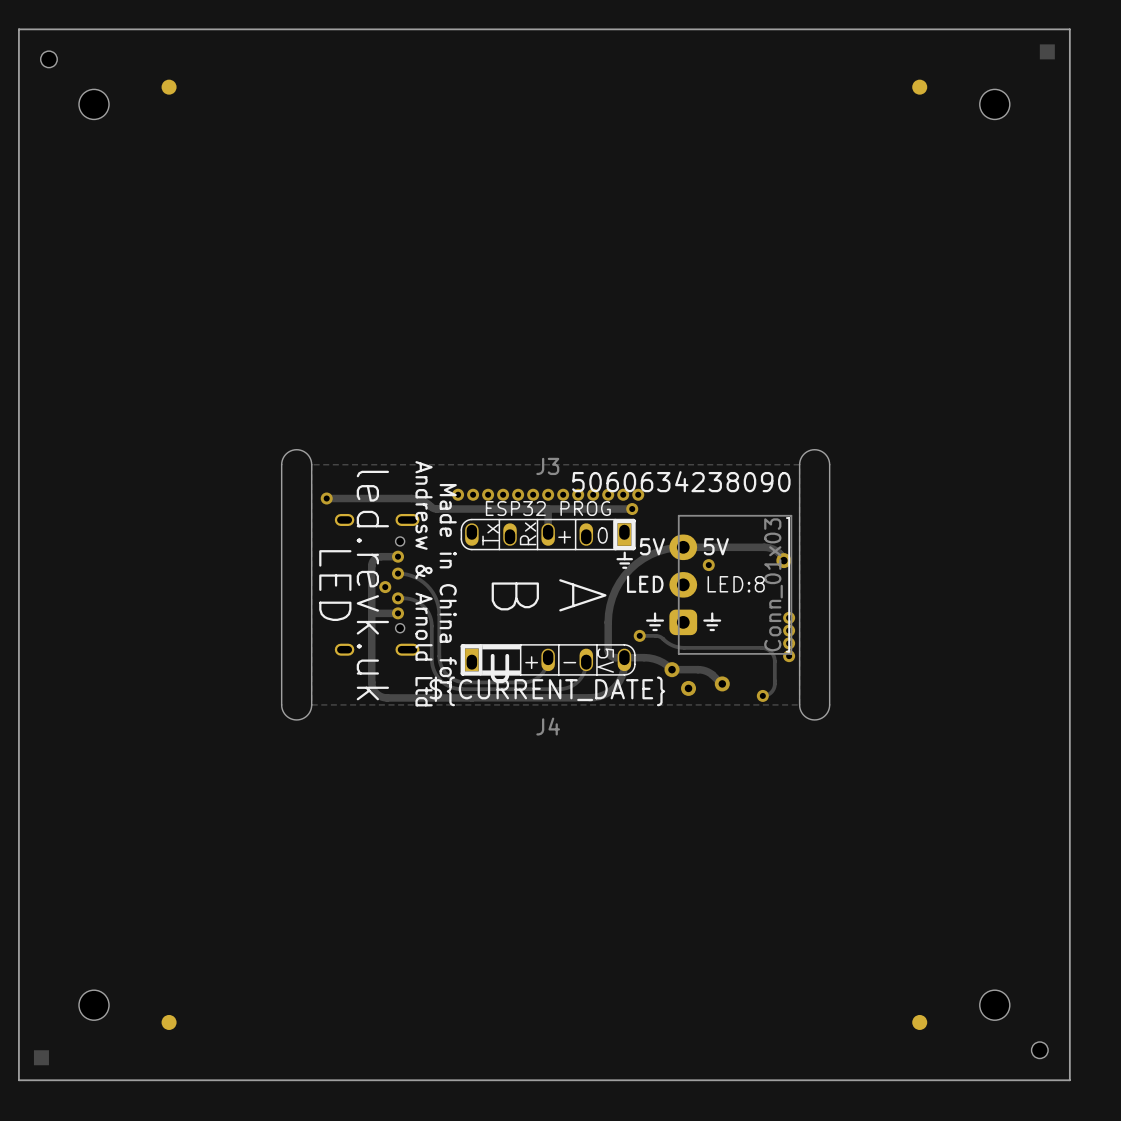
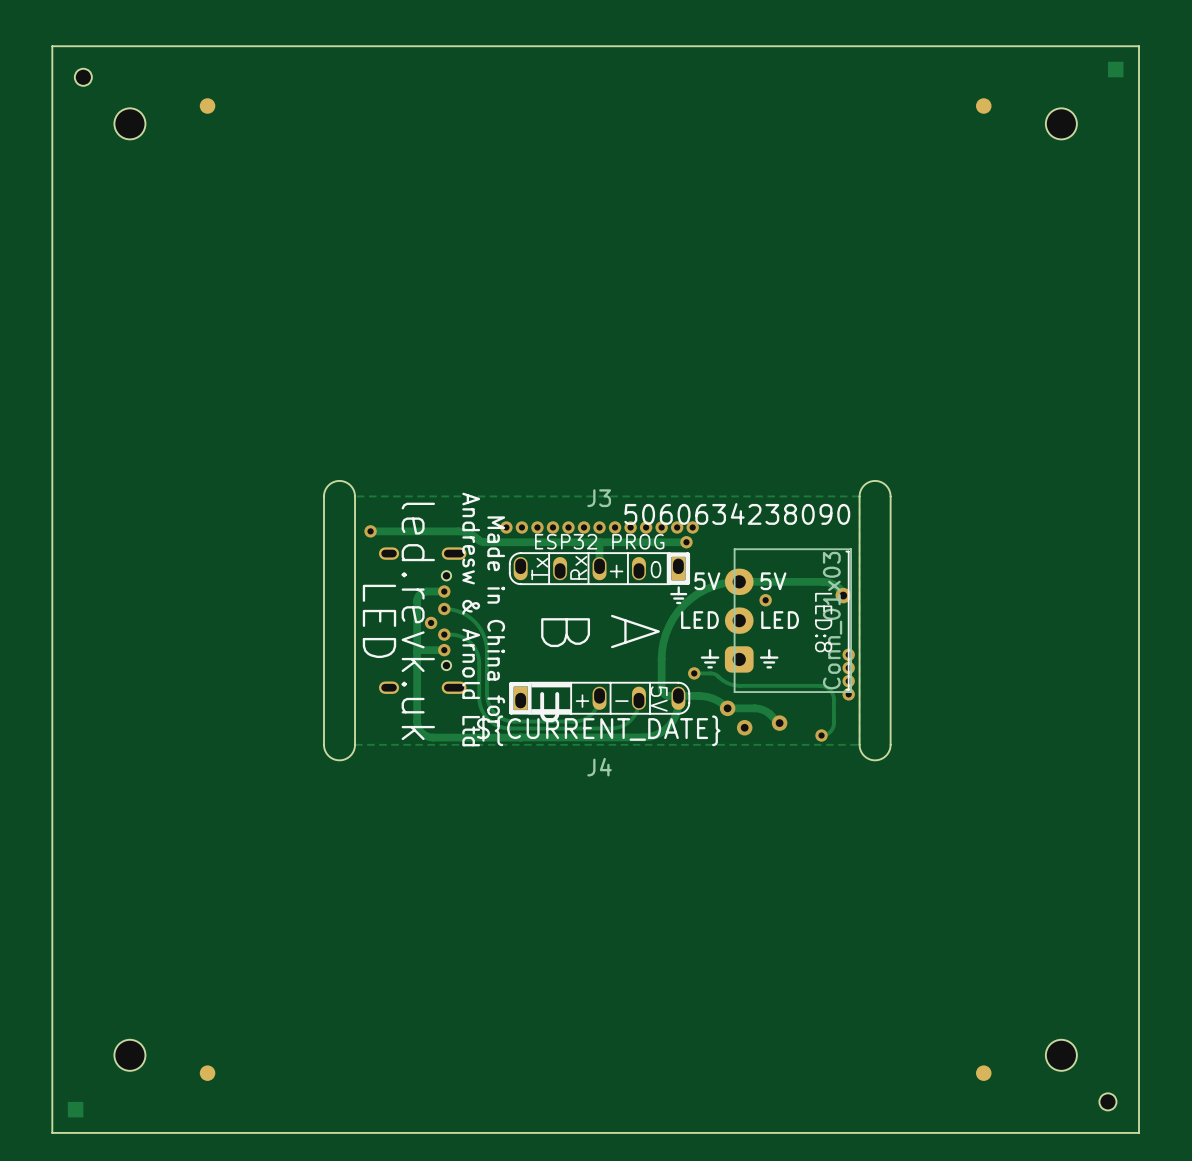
text: none -> LED (780, 620)
text rotation: 0° (736, 584) -> 90° clockwise (823, 622)

